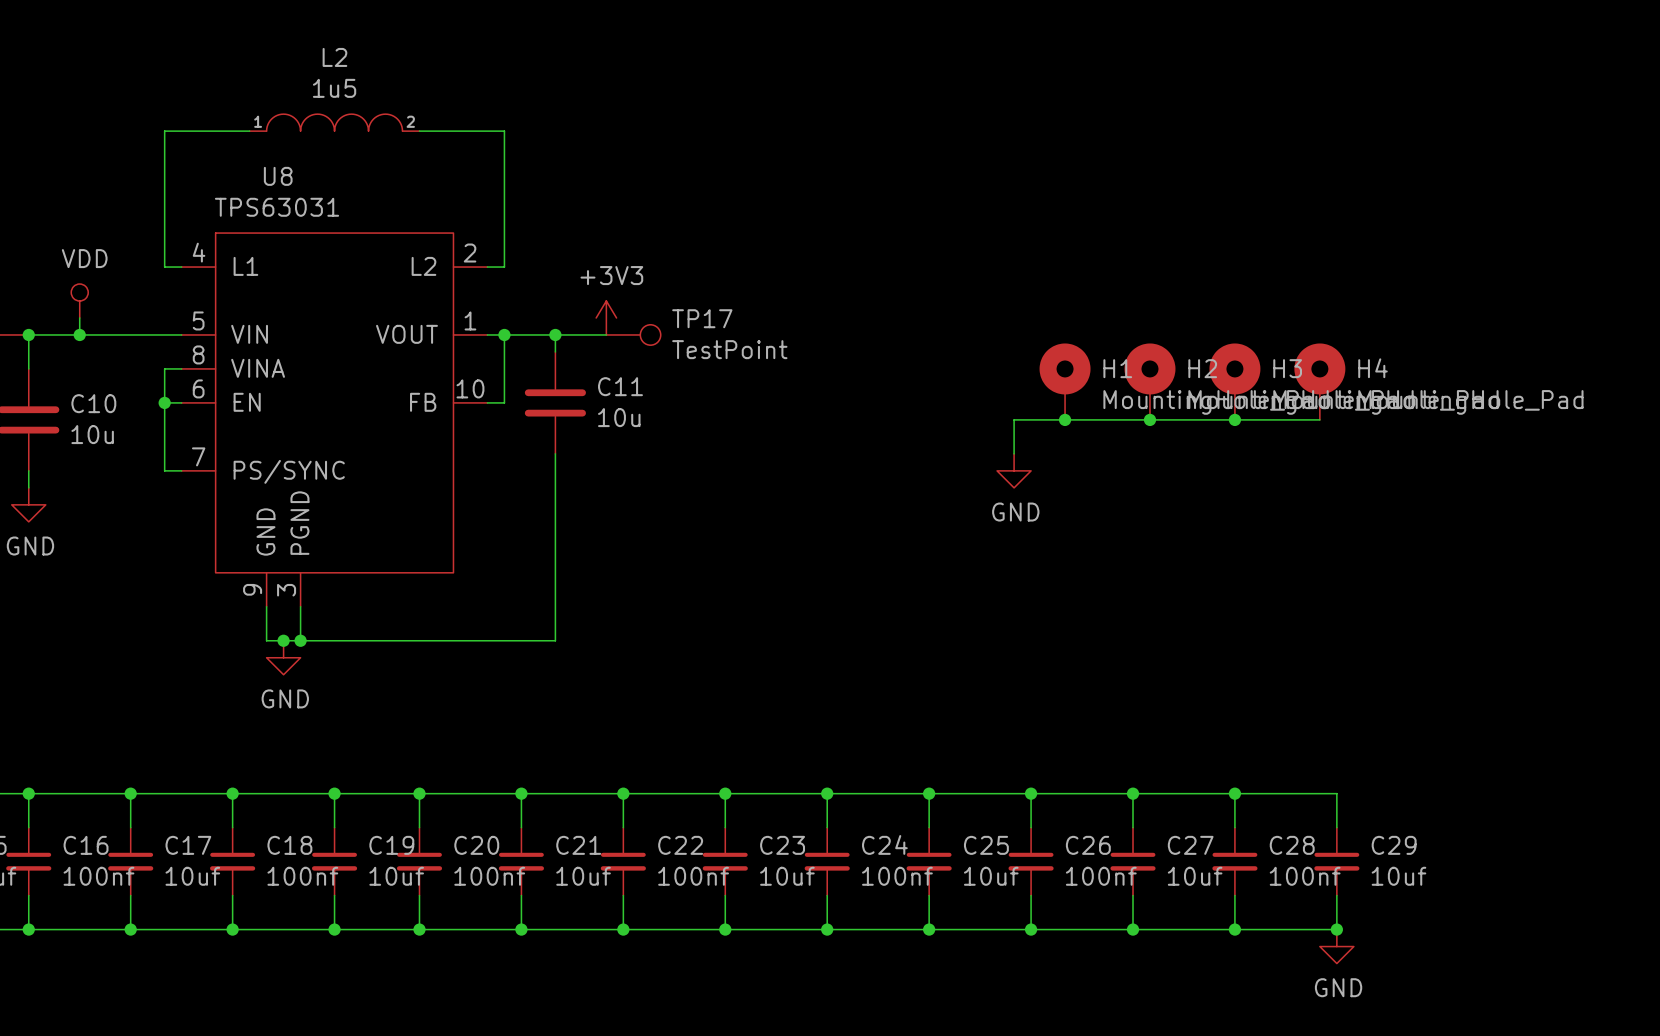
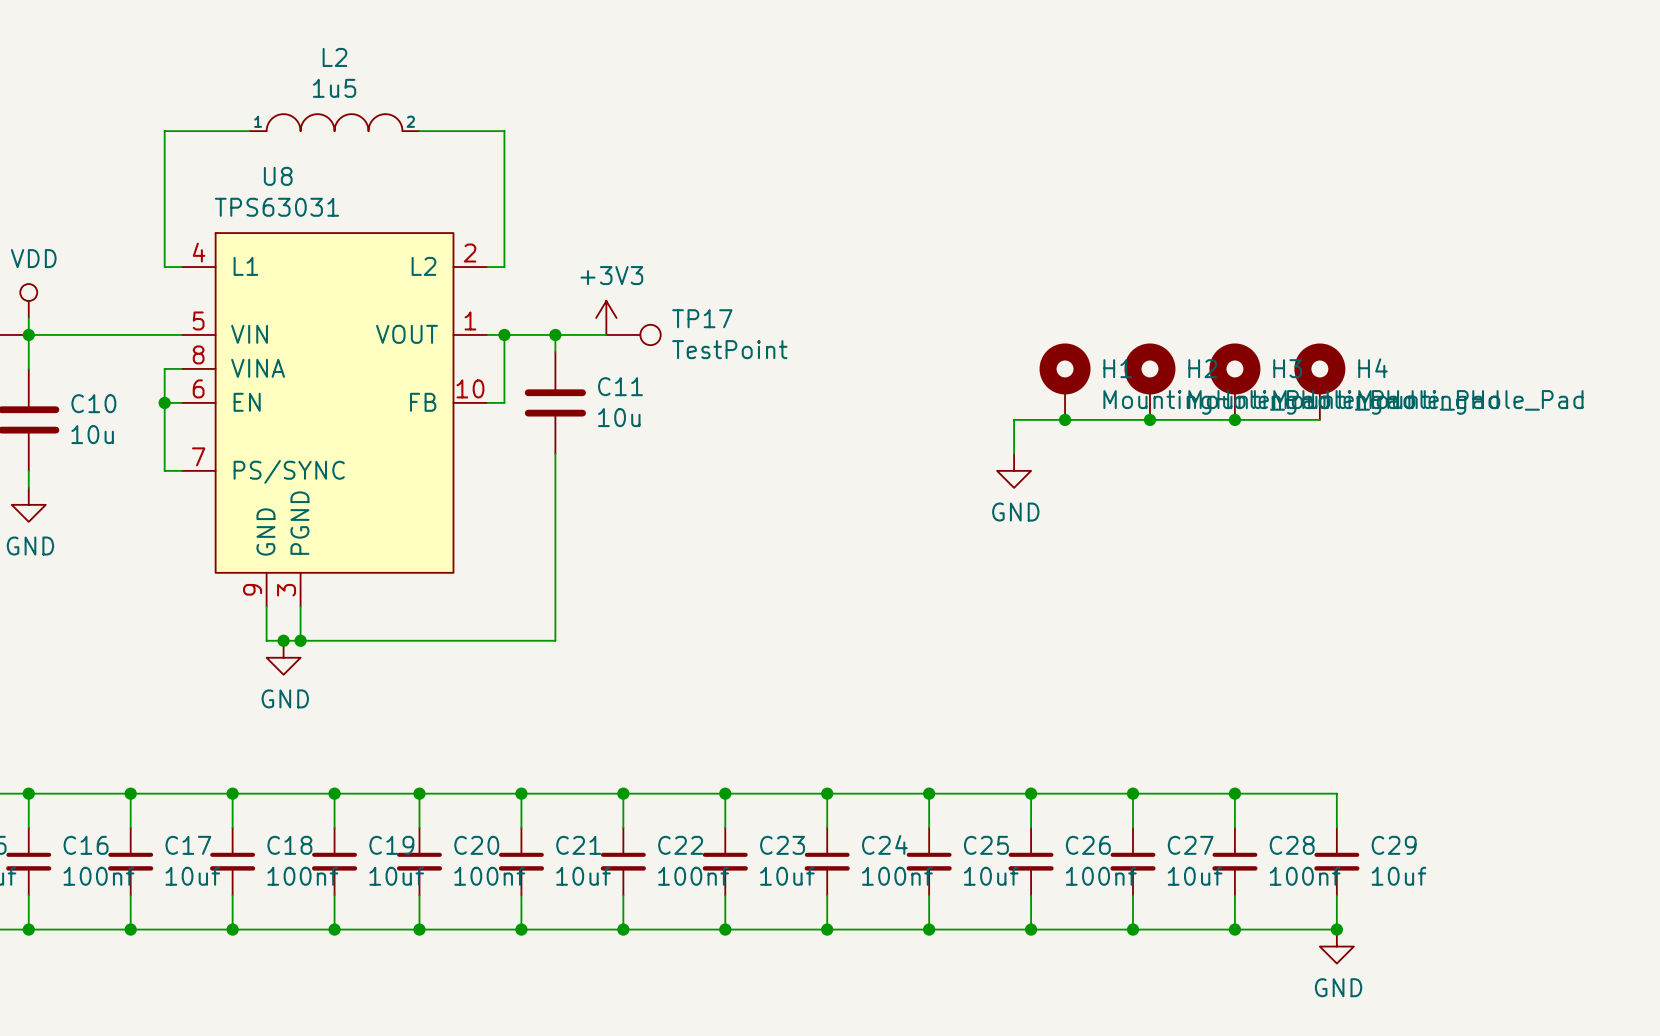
power symbol position: VDD (79, 301) -> VDD (28, 301)
wire: (79, 317) (79, 334) -> (28, 317) (28, 334)
junction: (79, 334) -> none

